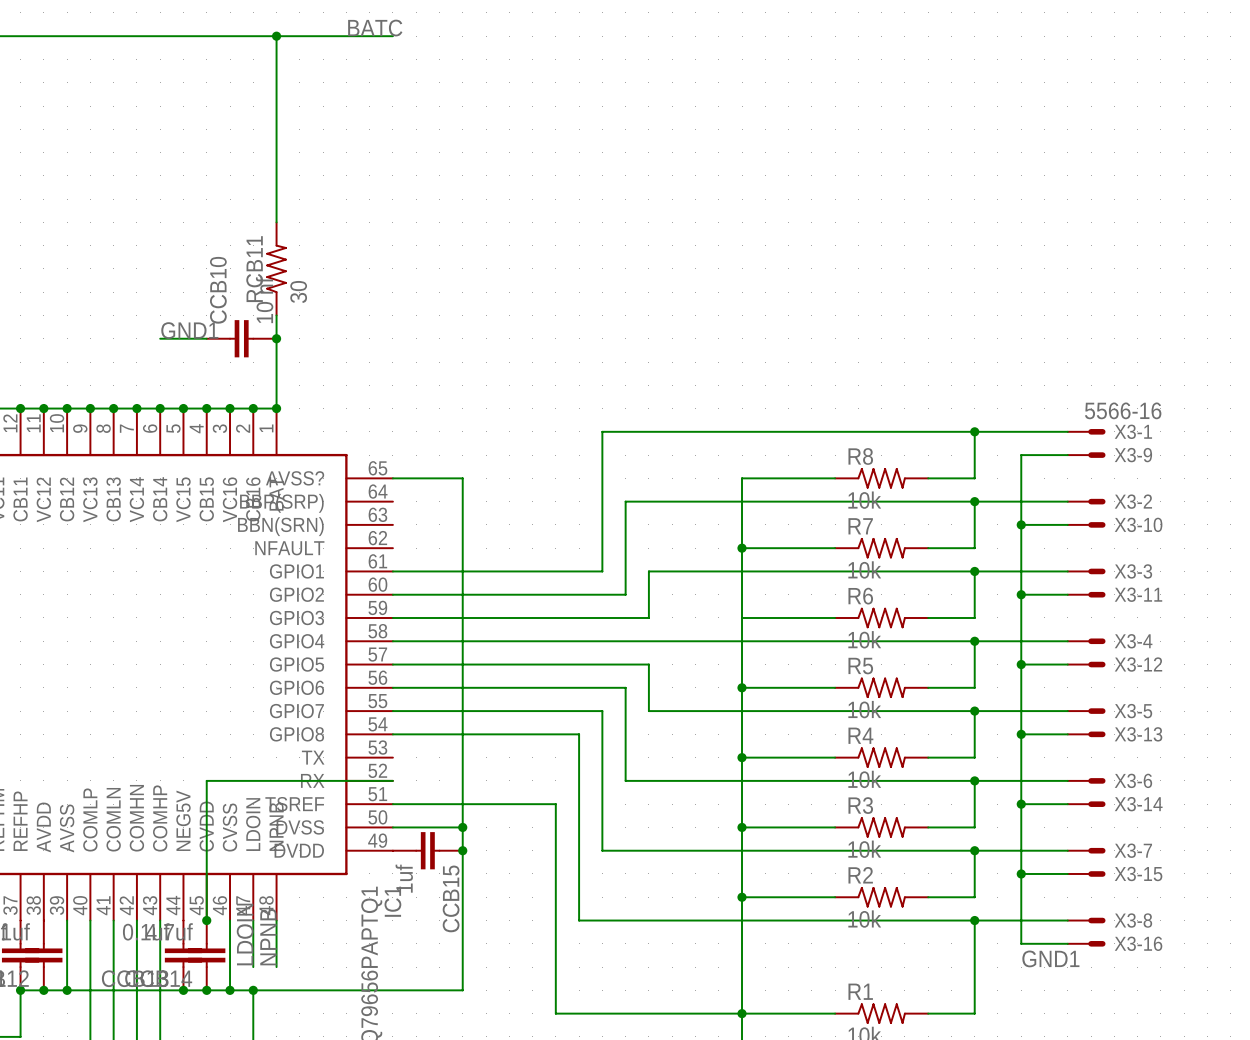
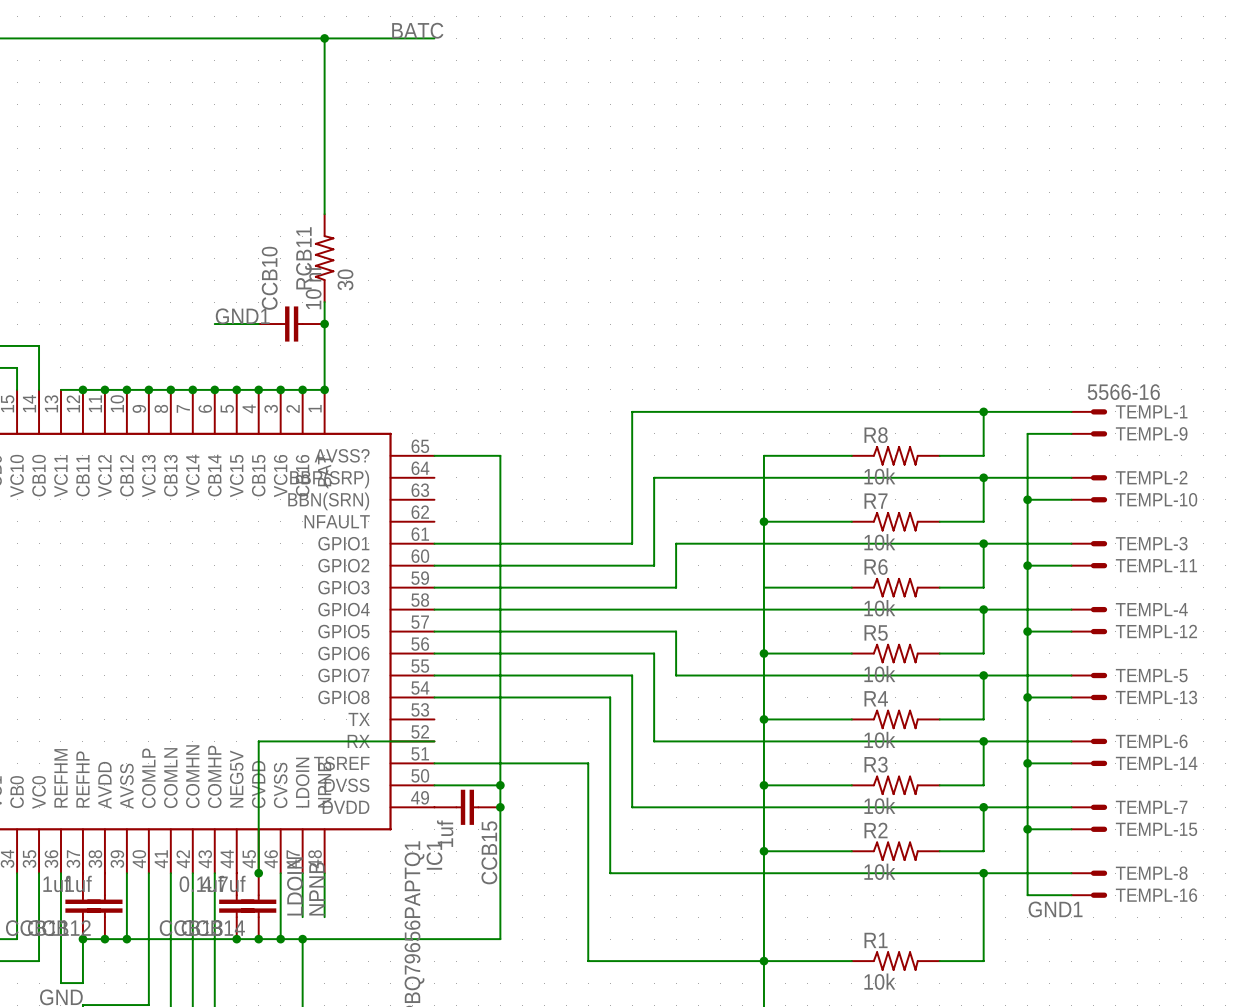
X3-1 name: X3-1 (1133, 431) -> TEMPL-1 (1151, 411)
X3-9 name: X3-9 (1133, 455) -> TEMPL-9 (1151, 433)
X3-2 name: X3-2 (1133, 501) -> TEMPL-2 (1151, 477)
X3-10 name: X3-10 (1138, 524) -> TEMPL-10 (1156, 499)
X3-3 name: X3-3 (1133, 571) -> TEMPL-3 (1151, 543)
X3-11 name: X3-11 (1138, 594) -> TEMPL-11 (1156, 565)
X3-4 name: X3-4 (1133, 641) -> TEMPL-4 (1151, 609)
X3-12 name: X3-12 (1138, 664) -> TEMPL-12 (1156, 631)
X3-5 name: X3-5 (1133, 711) -> TEMPL-5 (1151, 675)
X3-13 name: X3-13 (1138, 734) -> TEMPL-13 (1156, 697)
X3-6 name: X3-6 (1133, 780) -> TEMPL-6 (1151, 741)
X3-14 name: X3-14 (1138, 804) -> TEMPL-14 (1156, 763)
X3-7 name: X3-7 (1133, 850) -> TEMPL-7 (1151, 807)
X3-15 name: X3-15 (1138, 873) -> TEMPL-15 (1156, 829)
X3-8 name: X3-8 (1133, 920) -> TEMPL-8 (1151, 873)
X3-16 name: X3-16 (1138, 943) -> TEMPL-16 (1156, 895)

